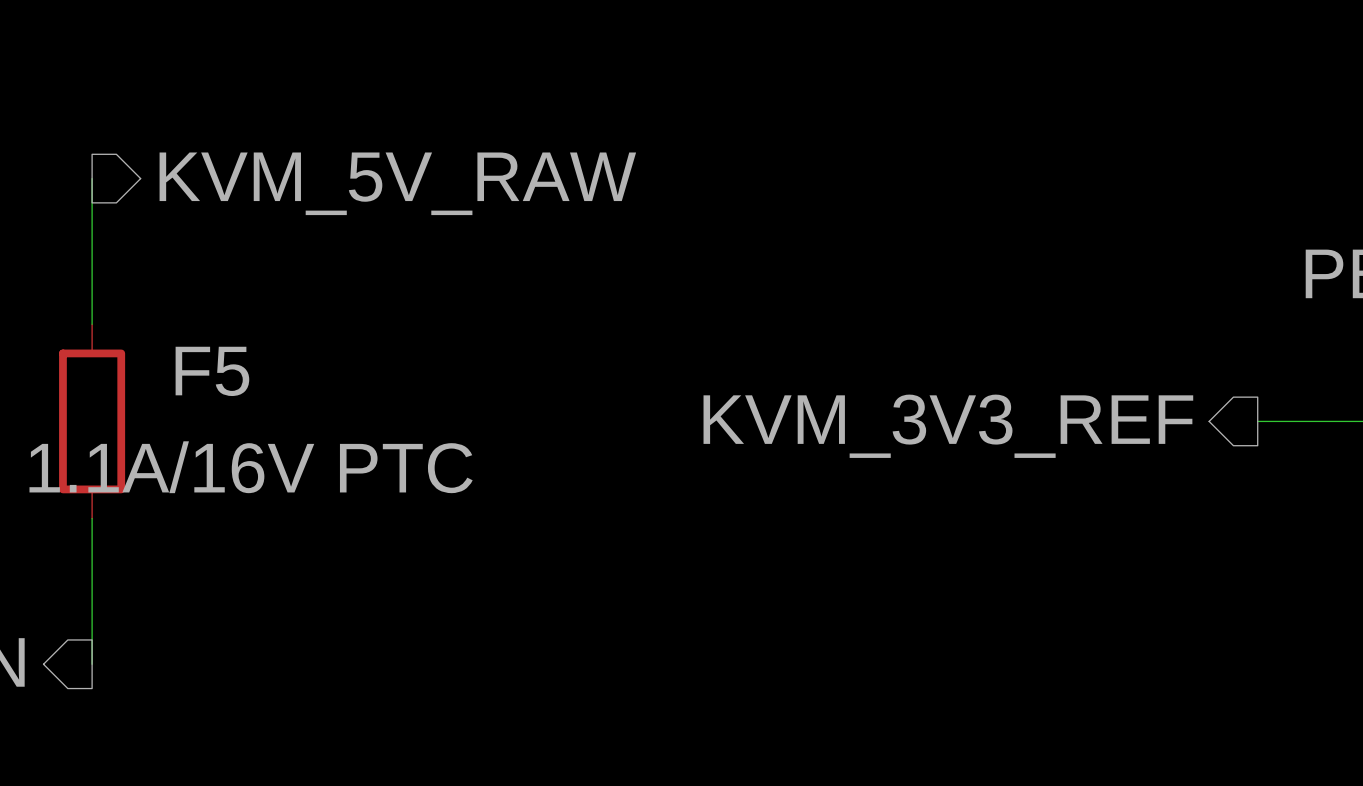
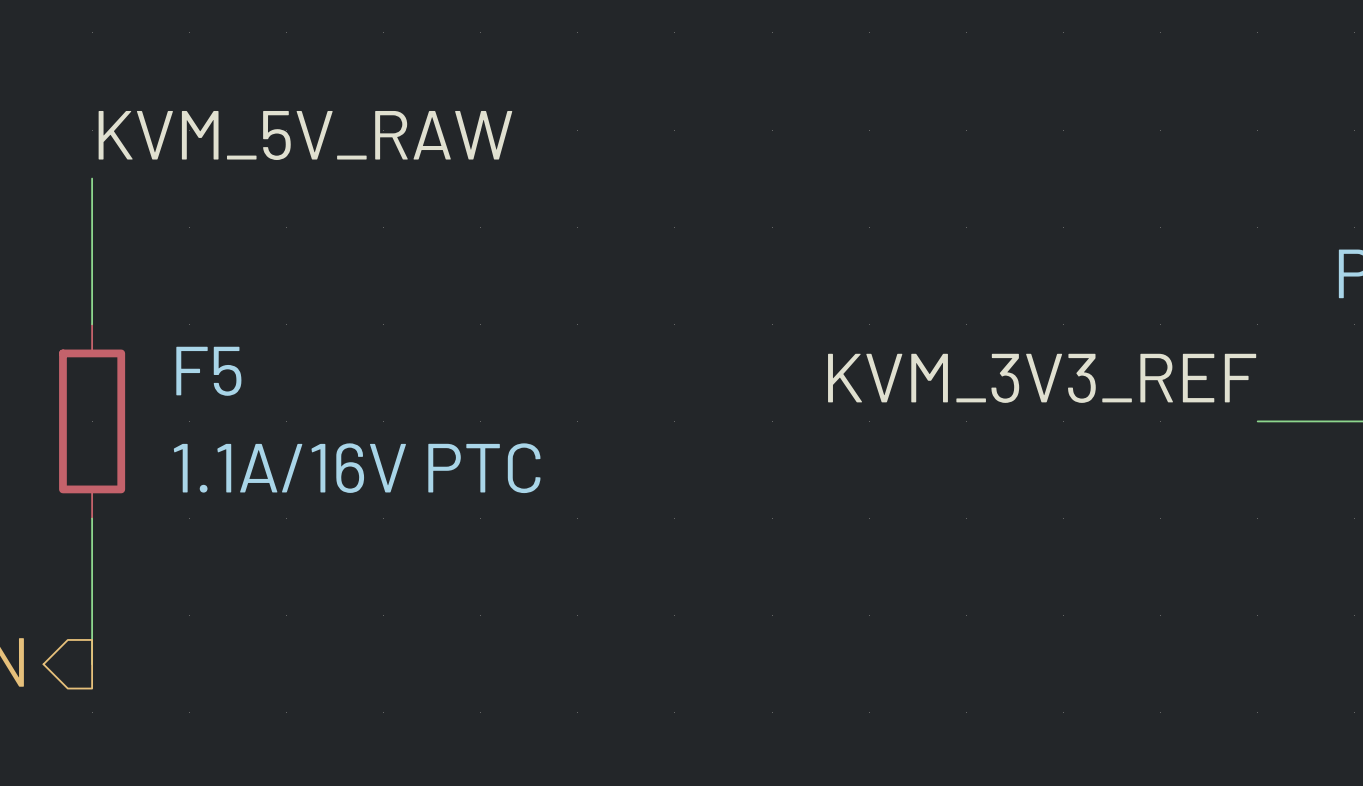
label: none -> KVM_5V_RAW (305, 135)
hierarchical label: KVM_5V_RAW (397, 183) -> none
label: none -> KVM_3V3_REF (1042, 378)
hierarchical label: KVM_3V3_REF (948, 426) -> none
F5 value position: 1.1A/16V PTC (251, 467) -> 1.1A/16V PTC (357, 468)

